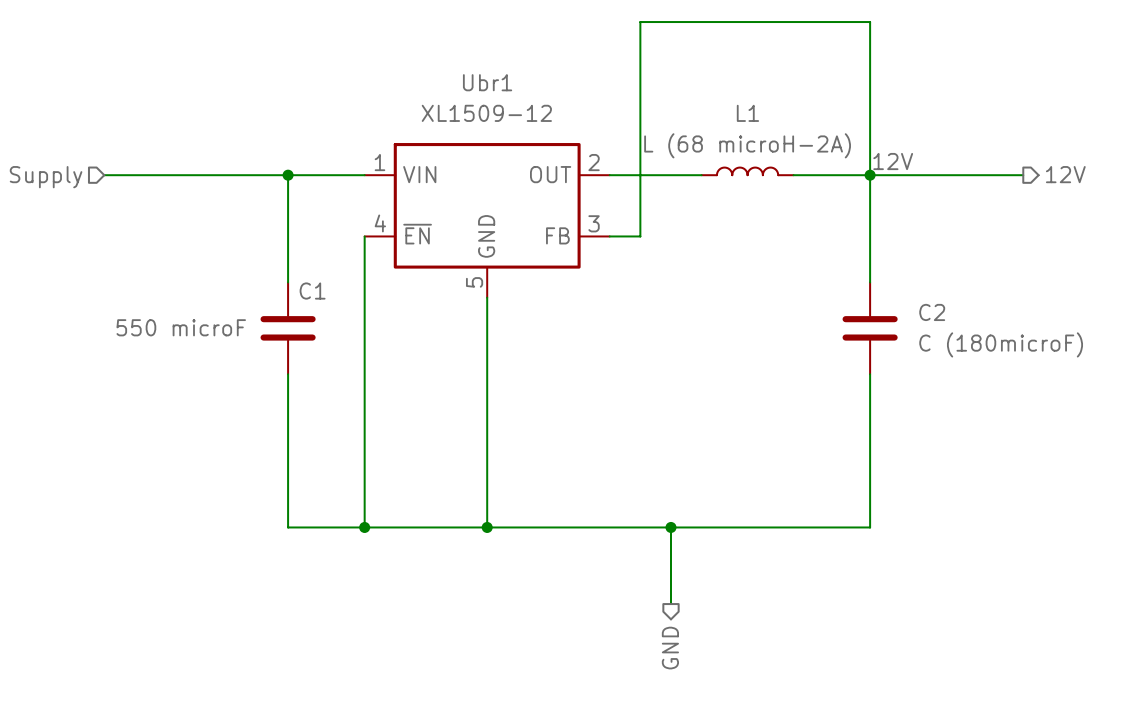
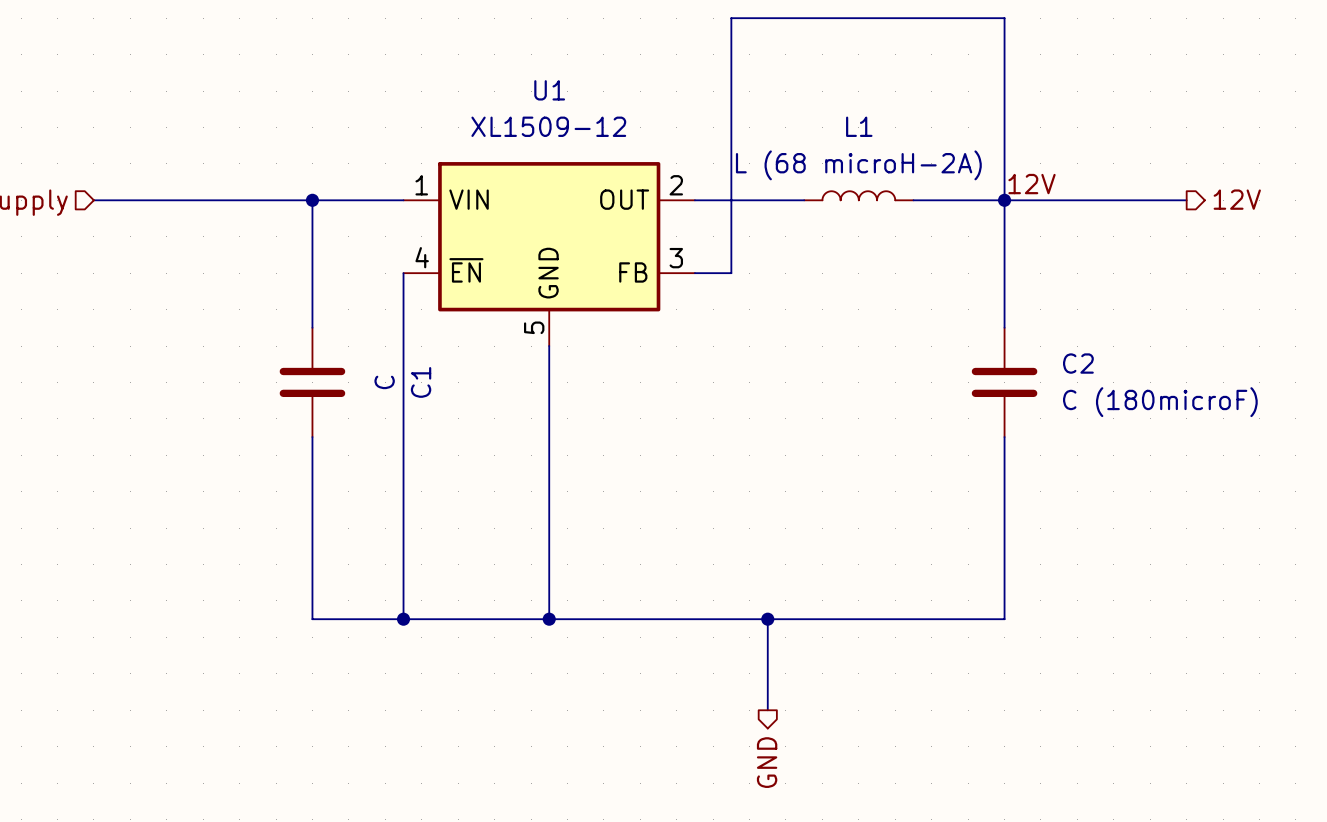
Ubr1 name: Ubr1 (487, 82) -> U1 (549, 90)
C1 name rotation: 0° (312, 291) -> 90° counterclockwise (421, 382)
C1 name position: C1 (312, 291) -> C1 (421, 382)
C1 value: 550 microF (181, 327) -> C (384, 382)

